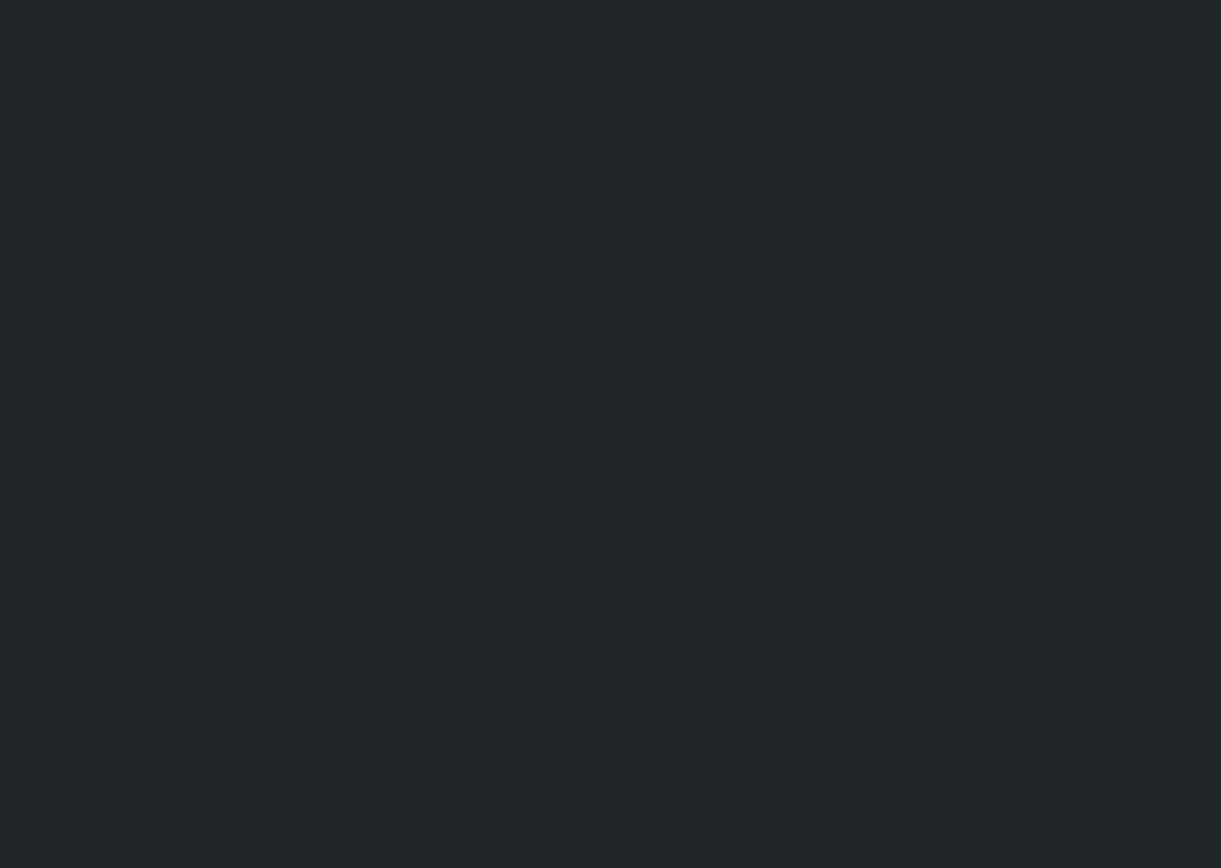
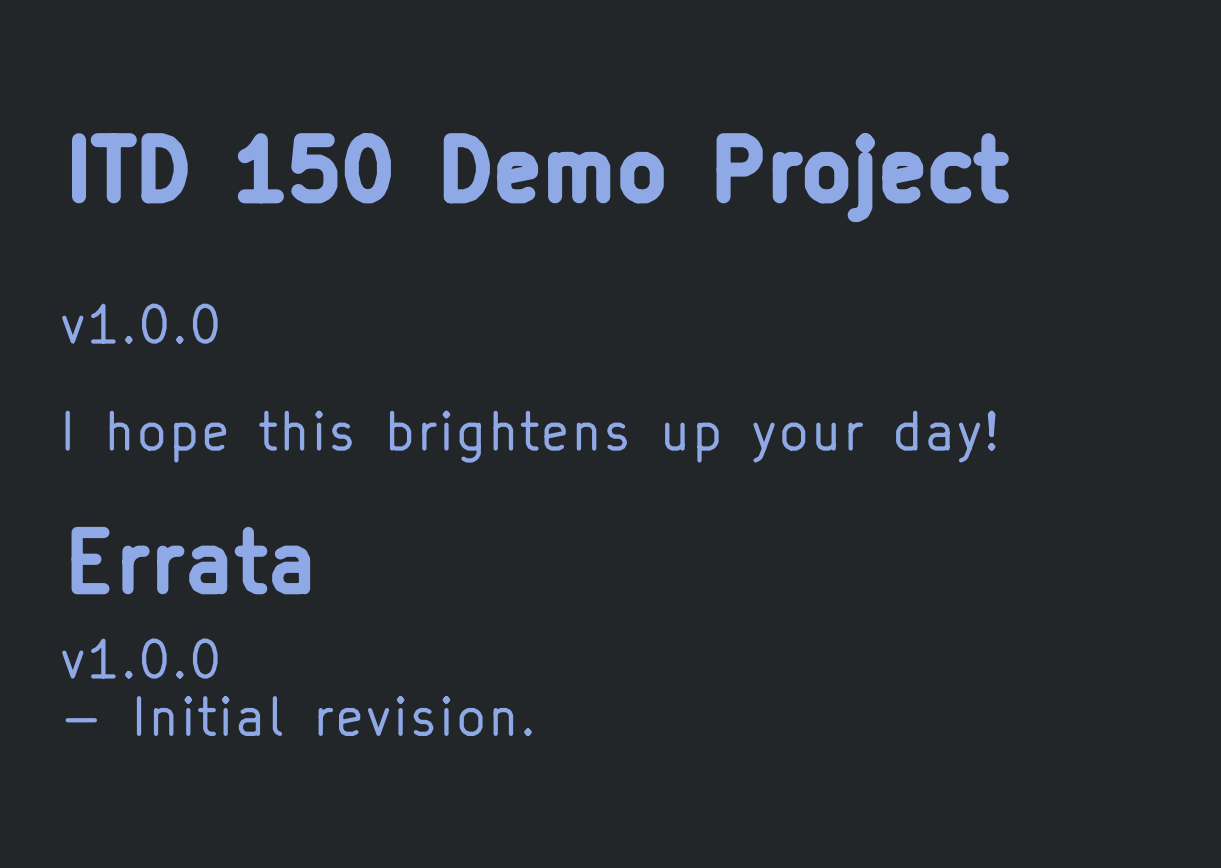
text: none -> ITD 150 Demo Project (540, 177)
text: none -> v1.0.0 (139, 323)
text: none -> I hope this brightens up your day! (530, 436)
text: none -> Errata (190, 560)
text: none -> v1.0.0 (139, 658)
text: none -> - Initial revision. (298, 716)

